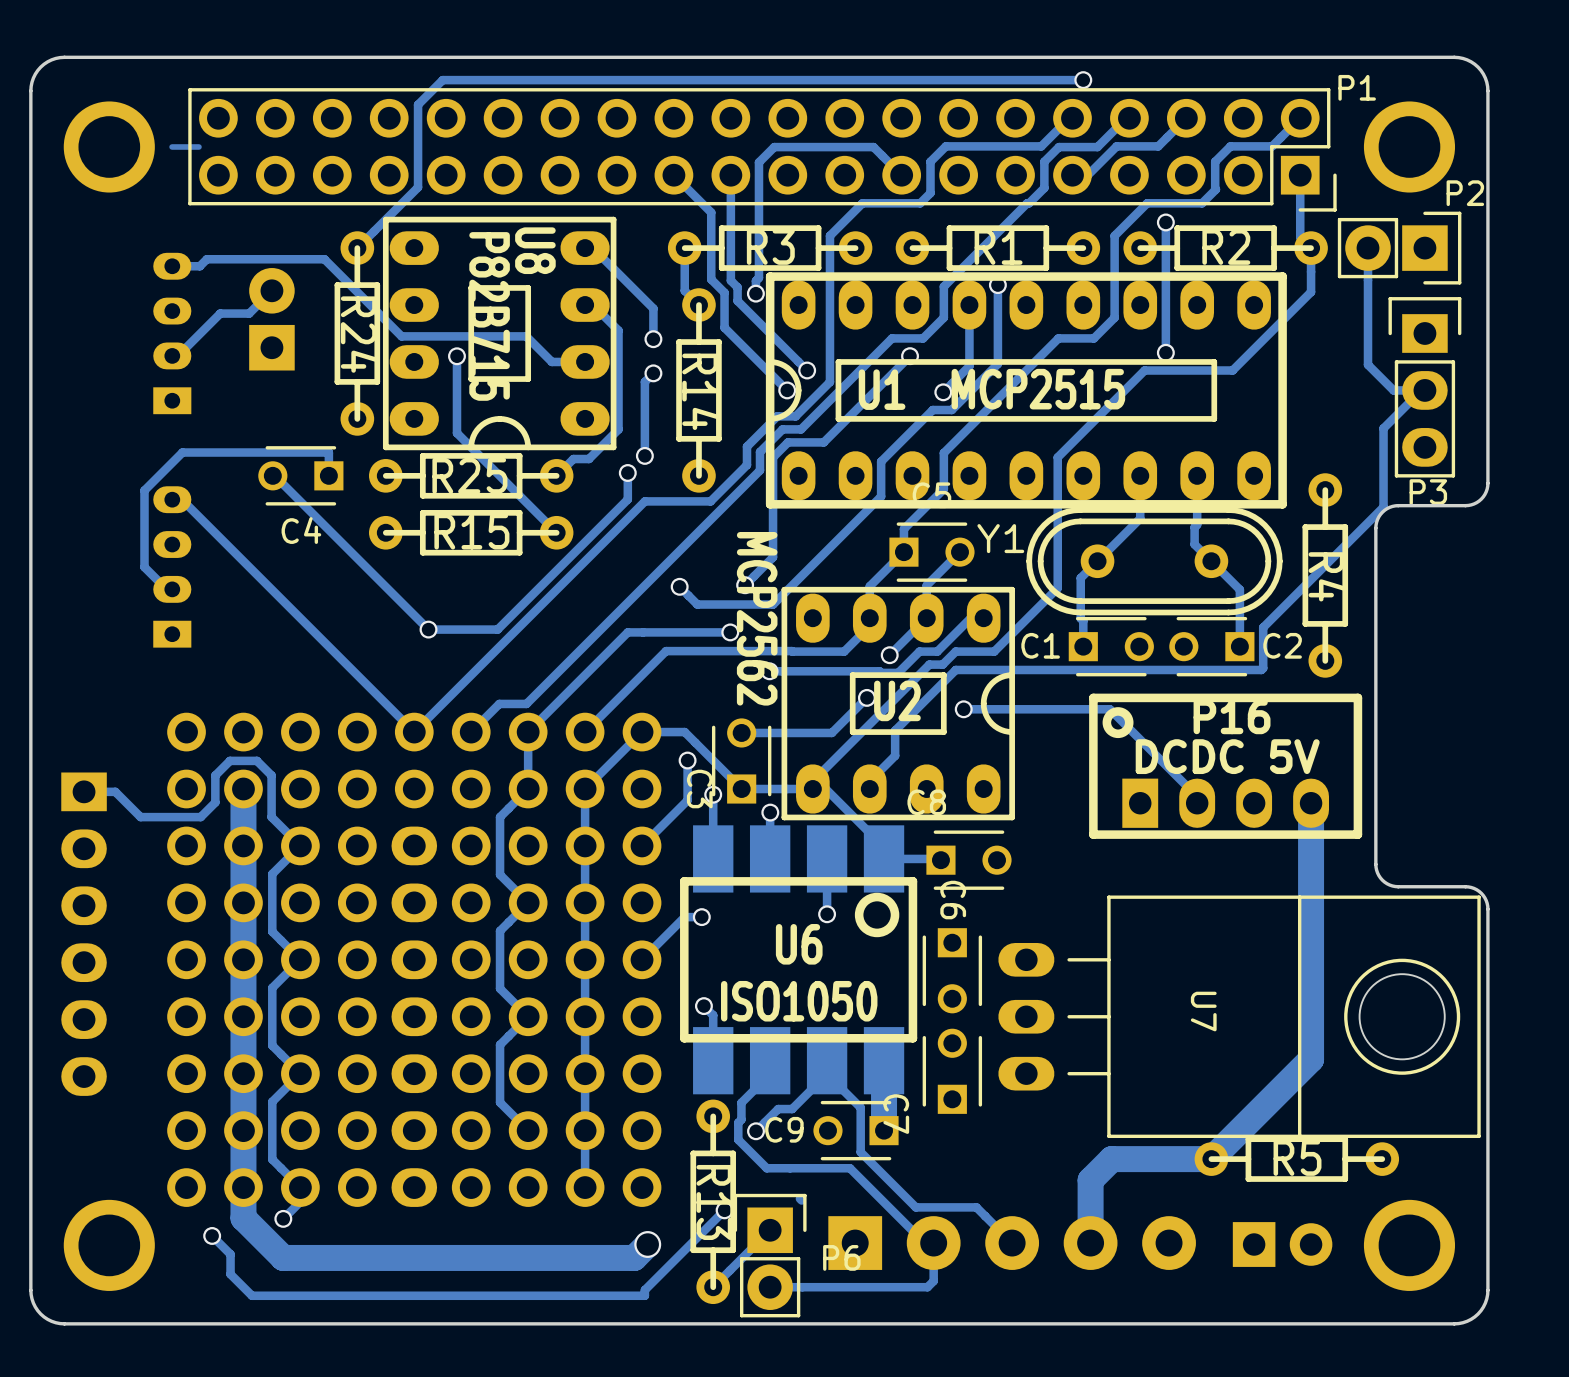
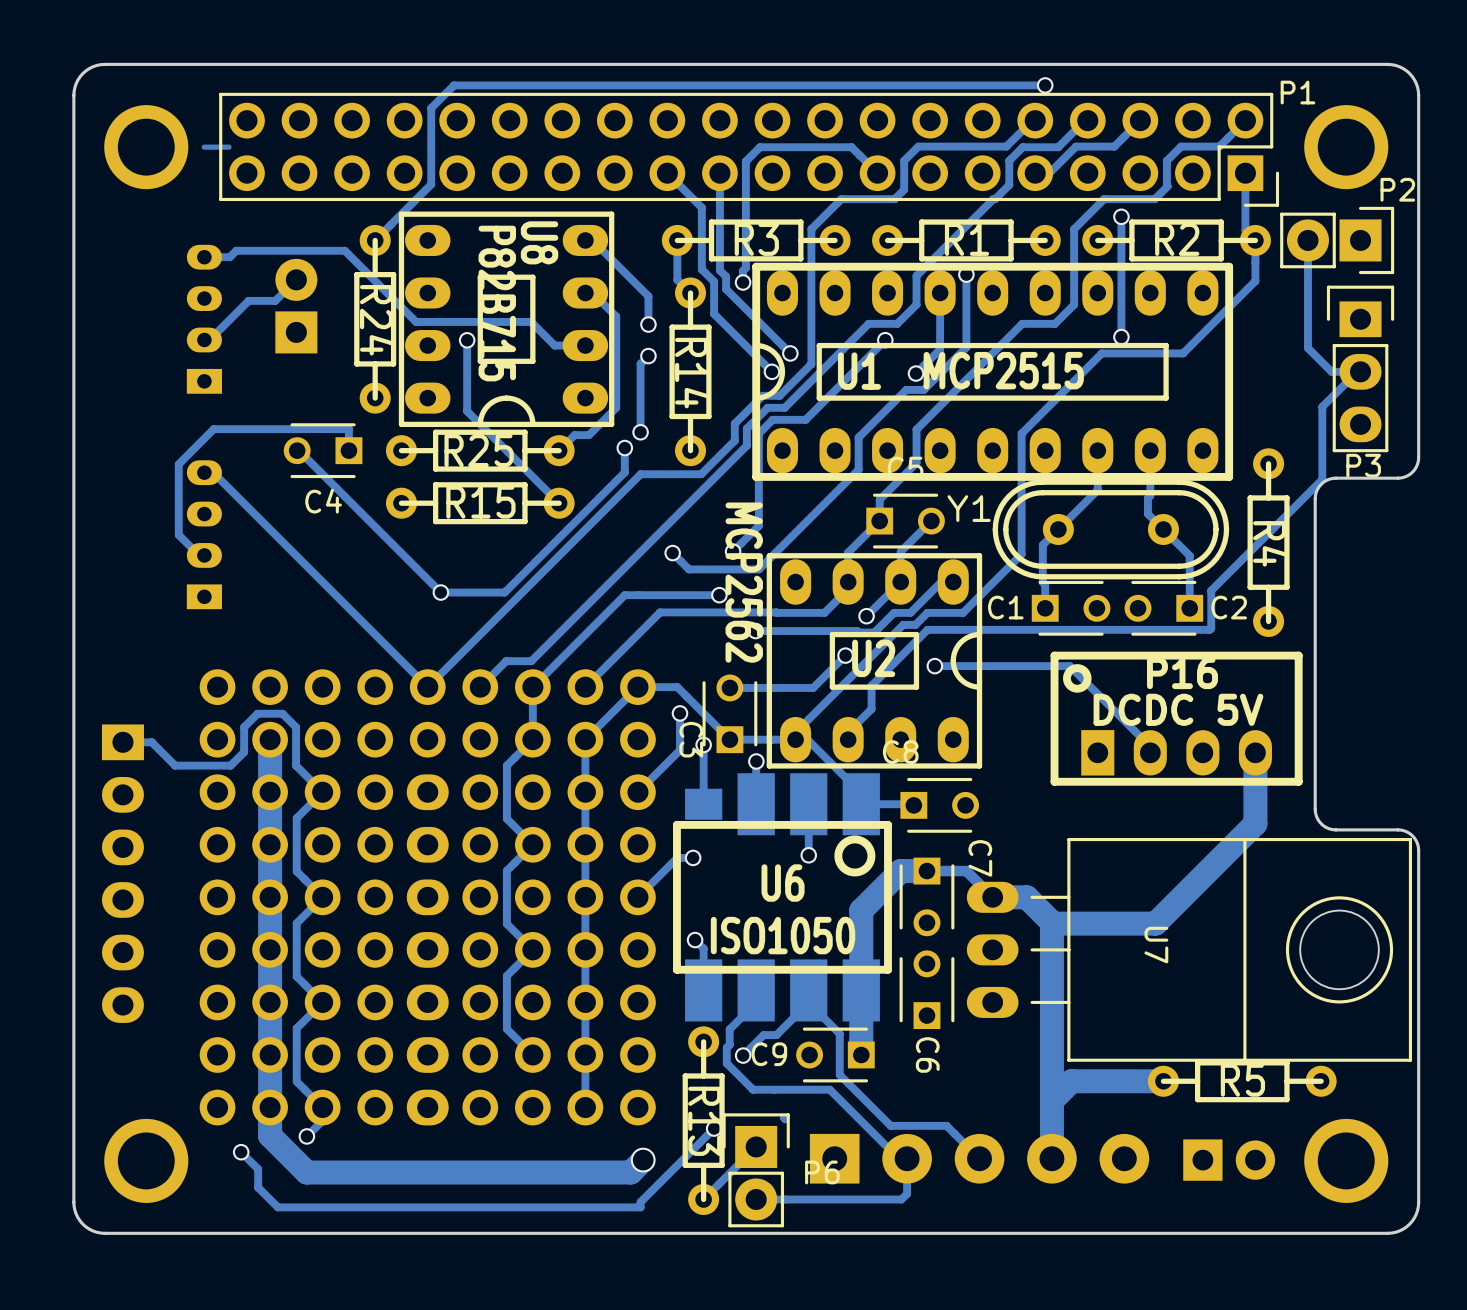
U6 footprint: [680, 825, 918, 1095] -> [673, 773, 892, 1022]
track: (1311, 880) (1311, 1059) (1211, 1159) -> (1255, 823) (1155, 923) (1051, 923)
C6 rotation: 0° (952, 970) -> 180° (926, 989)
C6 position: (952, 970) -> (926, 989)
track: none -> (861, 990) (861, 910) (900, 871) (966, 871) (992, 897) (1026, 897) (1051, 922) (1051, 1100)
C7 rotation: 0° (952, 1071) -> 180° (926, 896)
C7 position: (952, 1071) -> (926, 896)

